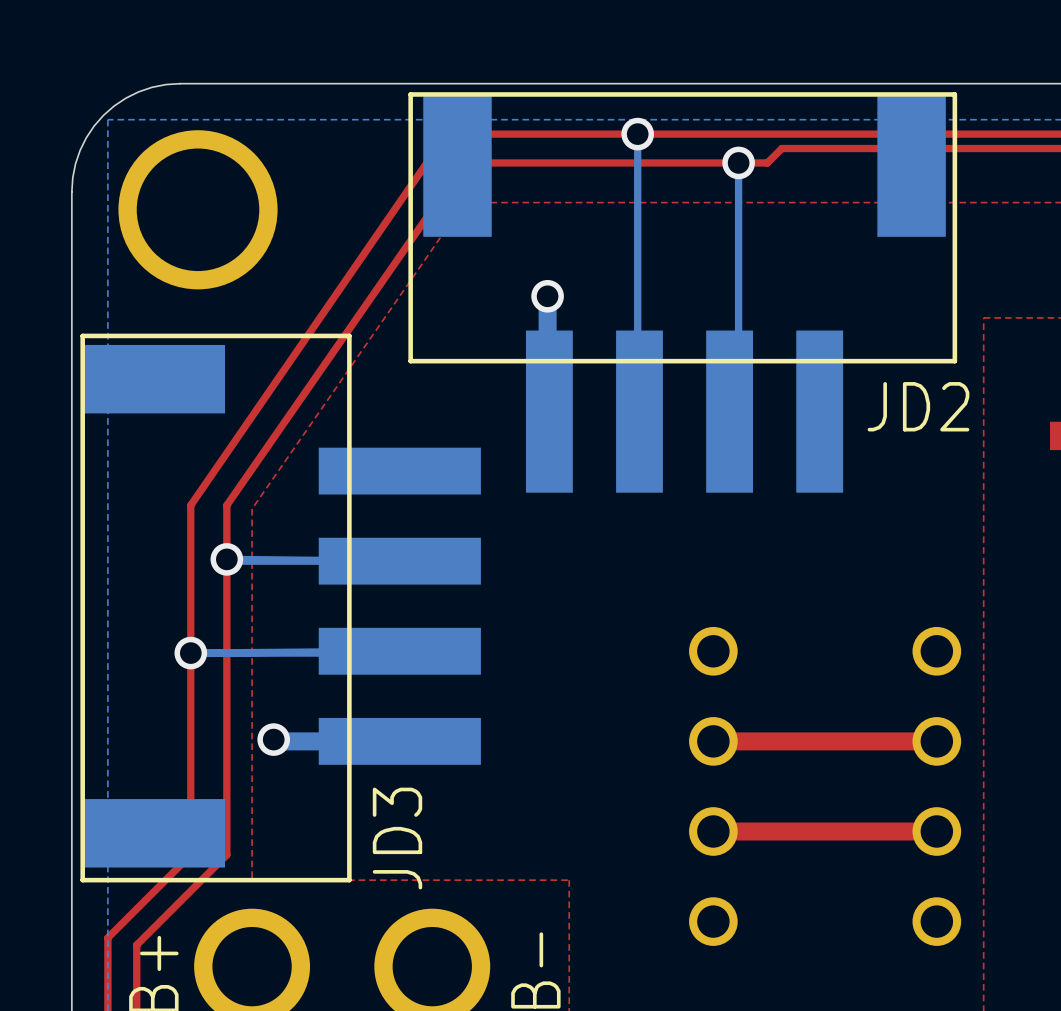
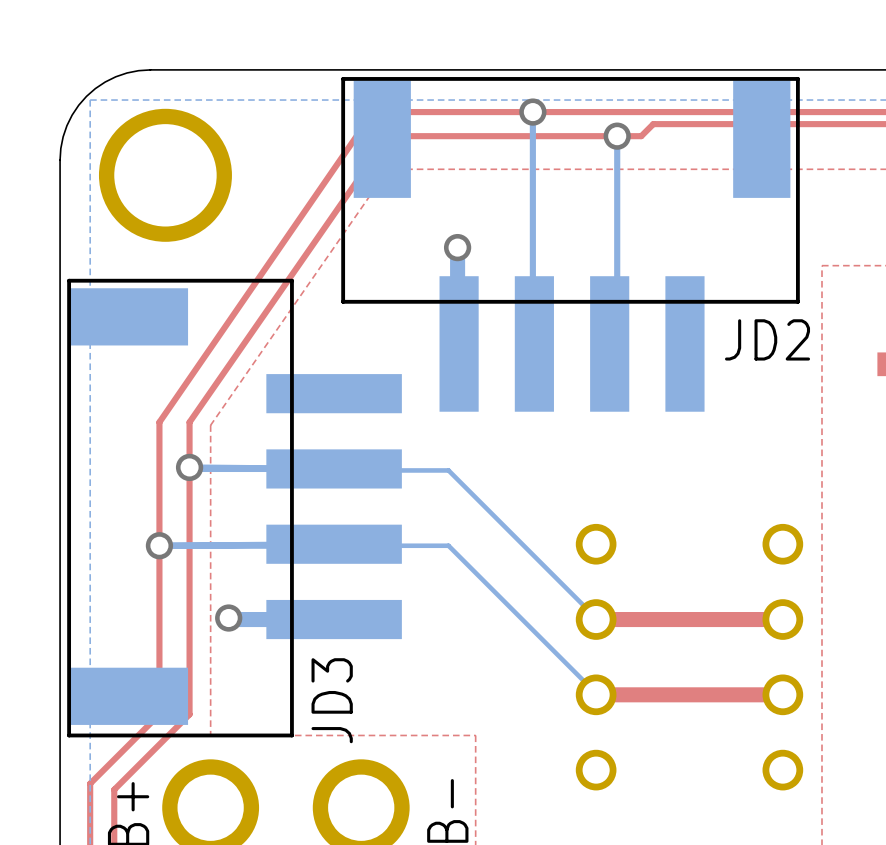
bottom track: none -> (334, 468) (334, 470) (448, 470) (596, 619)
bottom track: none -> (334, 544) (334, 545) (448, 545) (596, 694)

